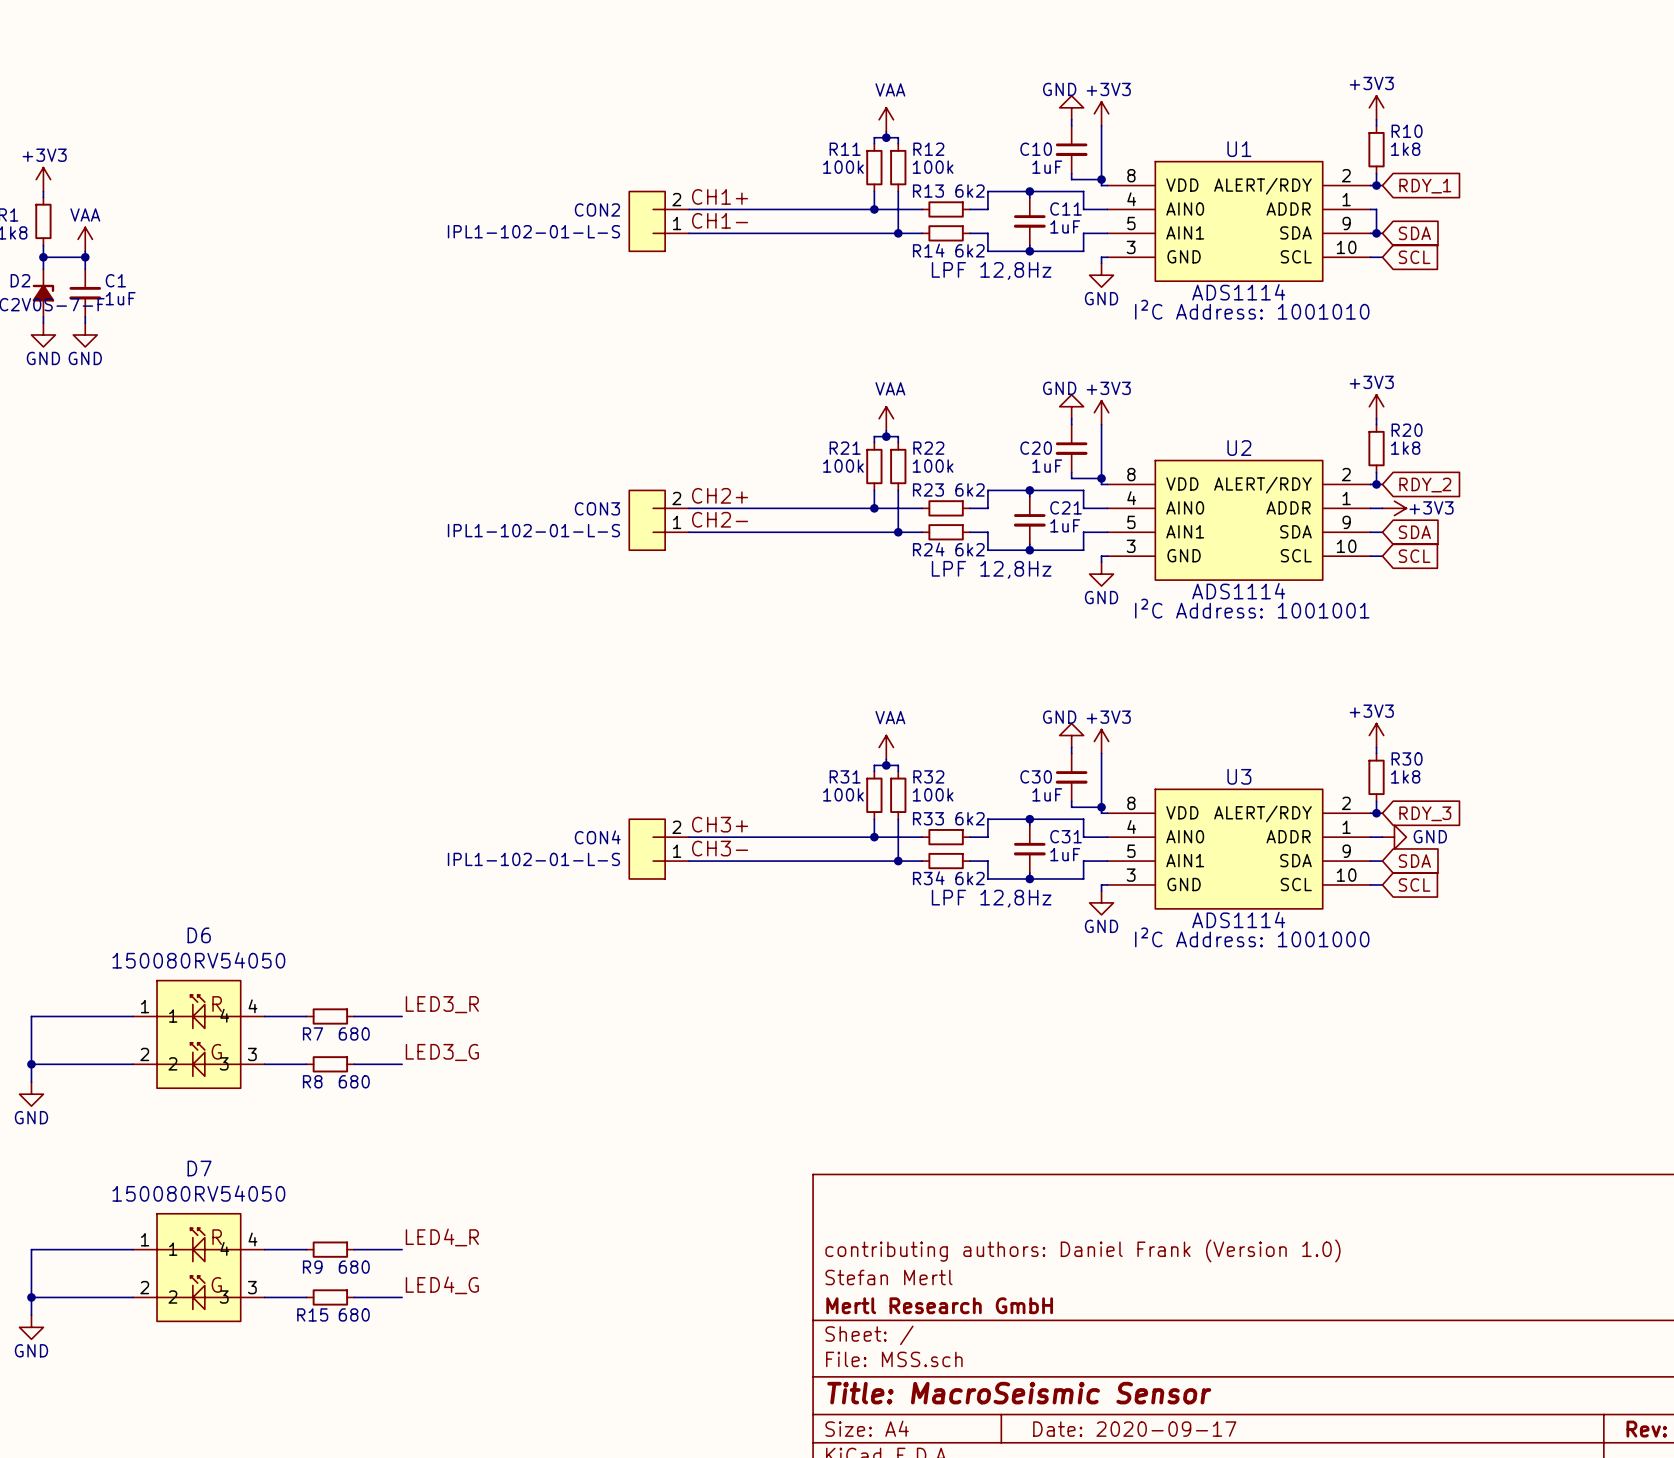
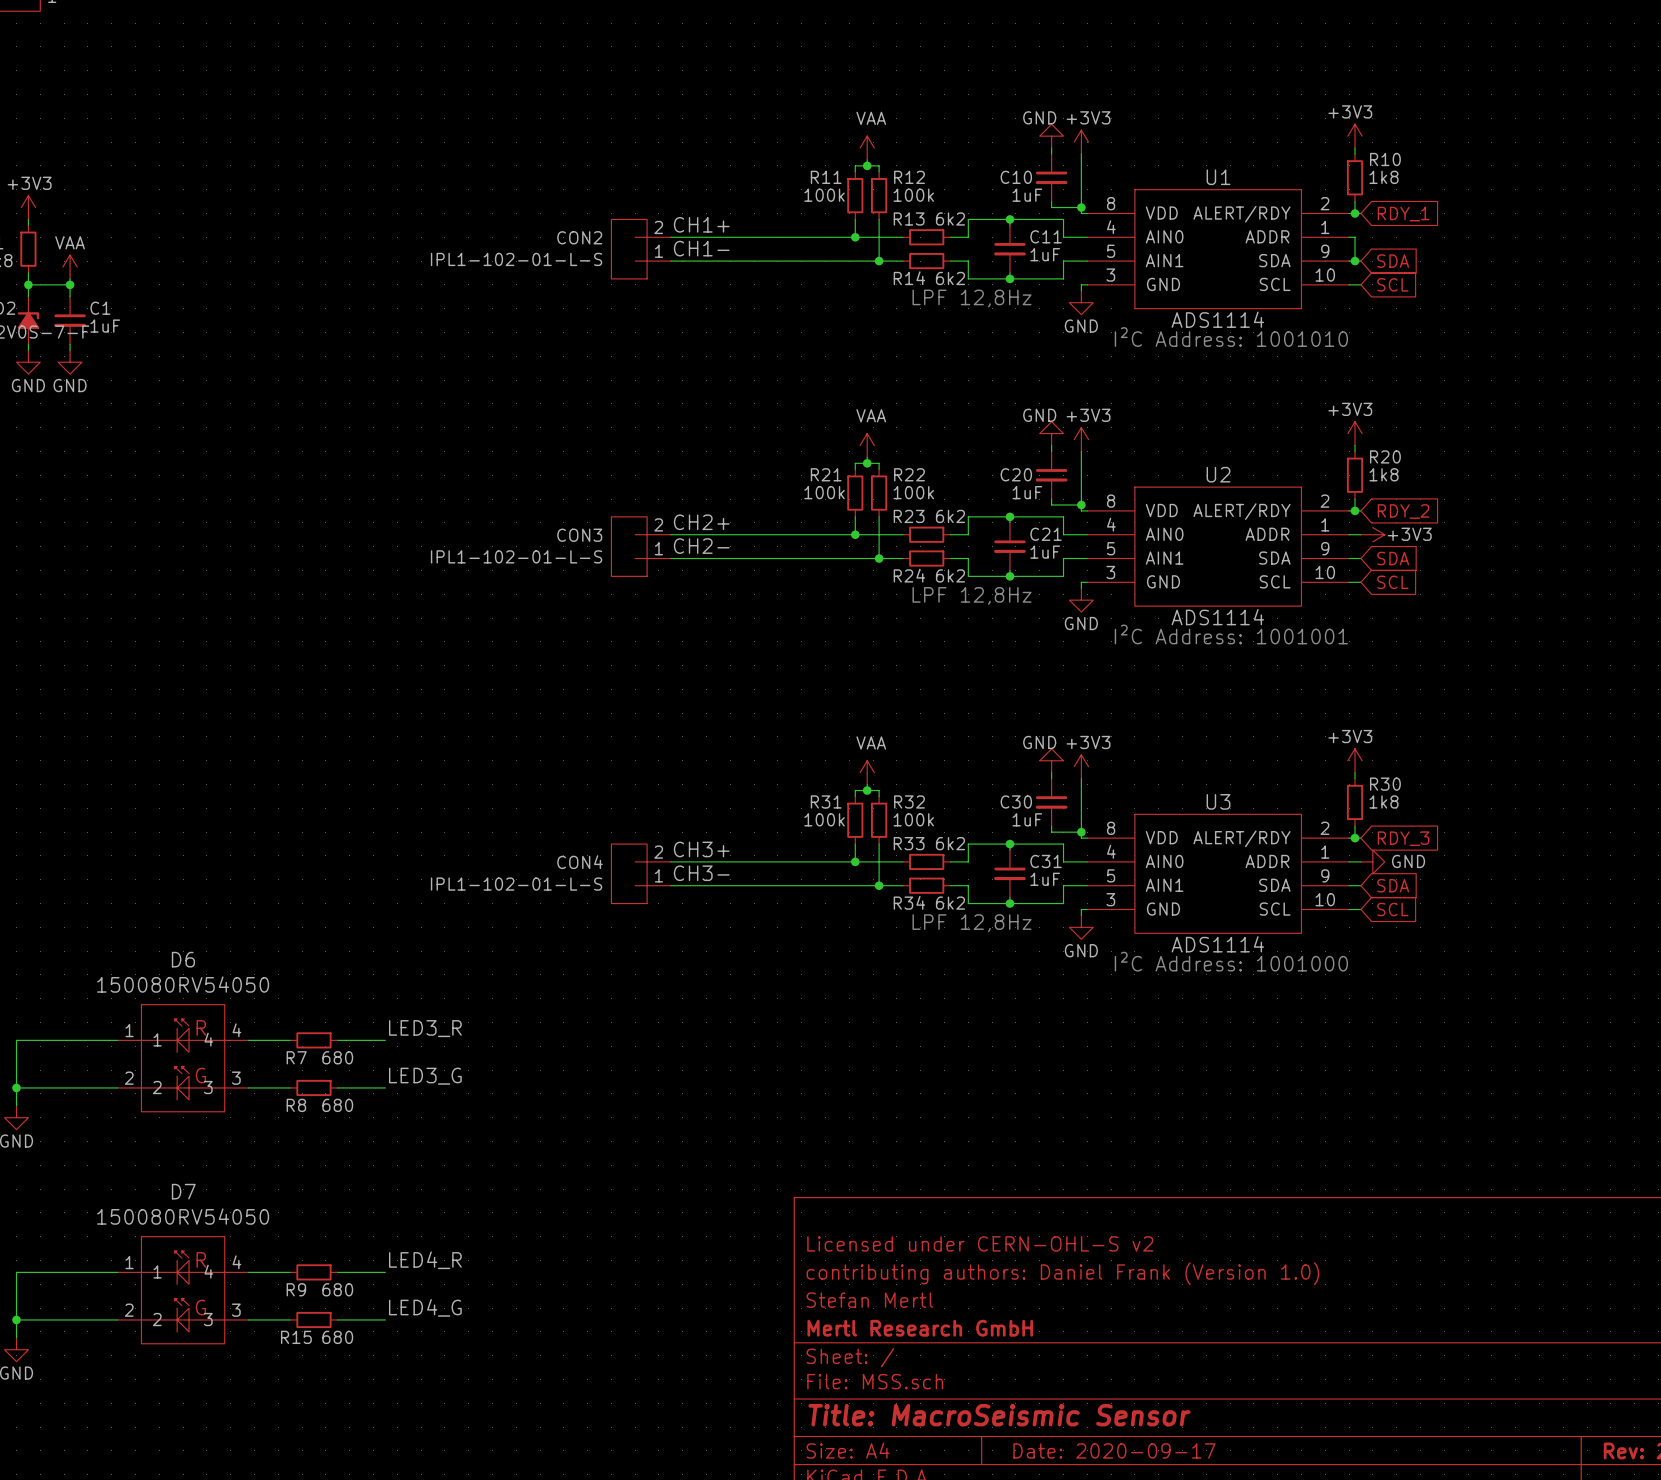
title block: none -> Licensed under CERN-OHL-S v2 (980, 1243)

